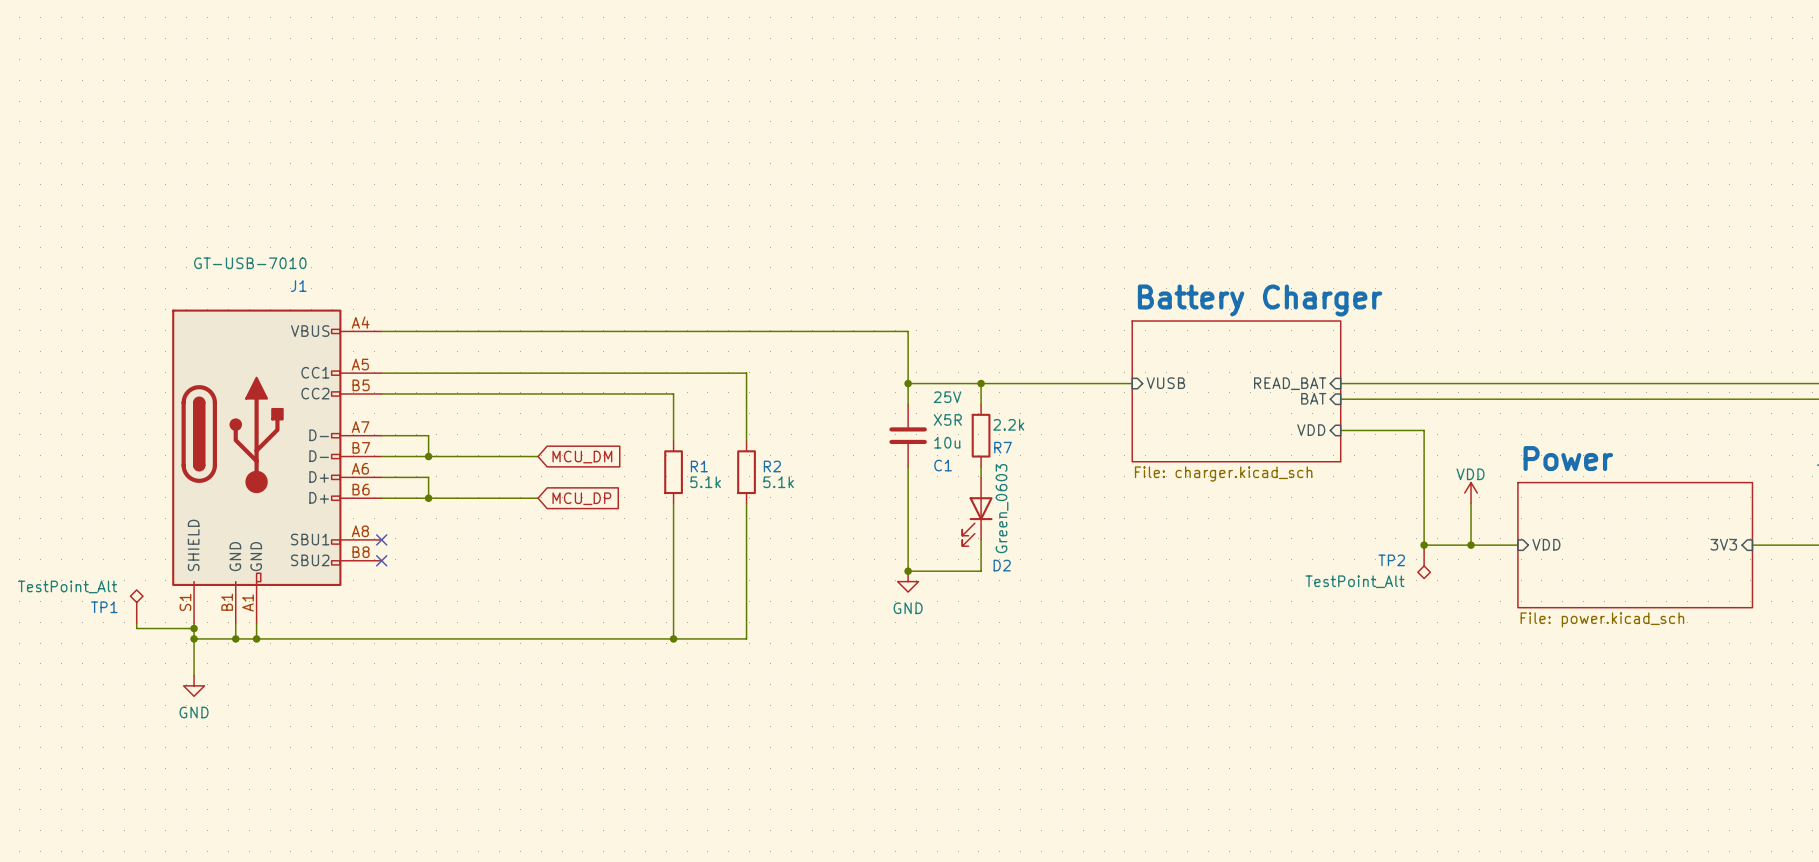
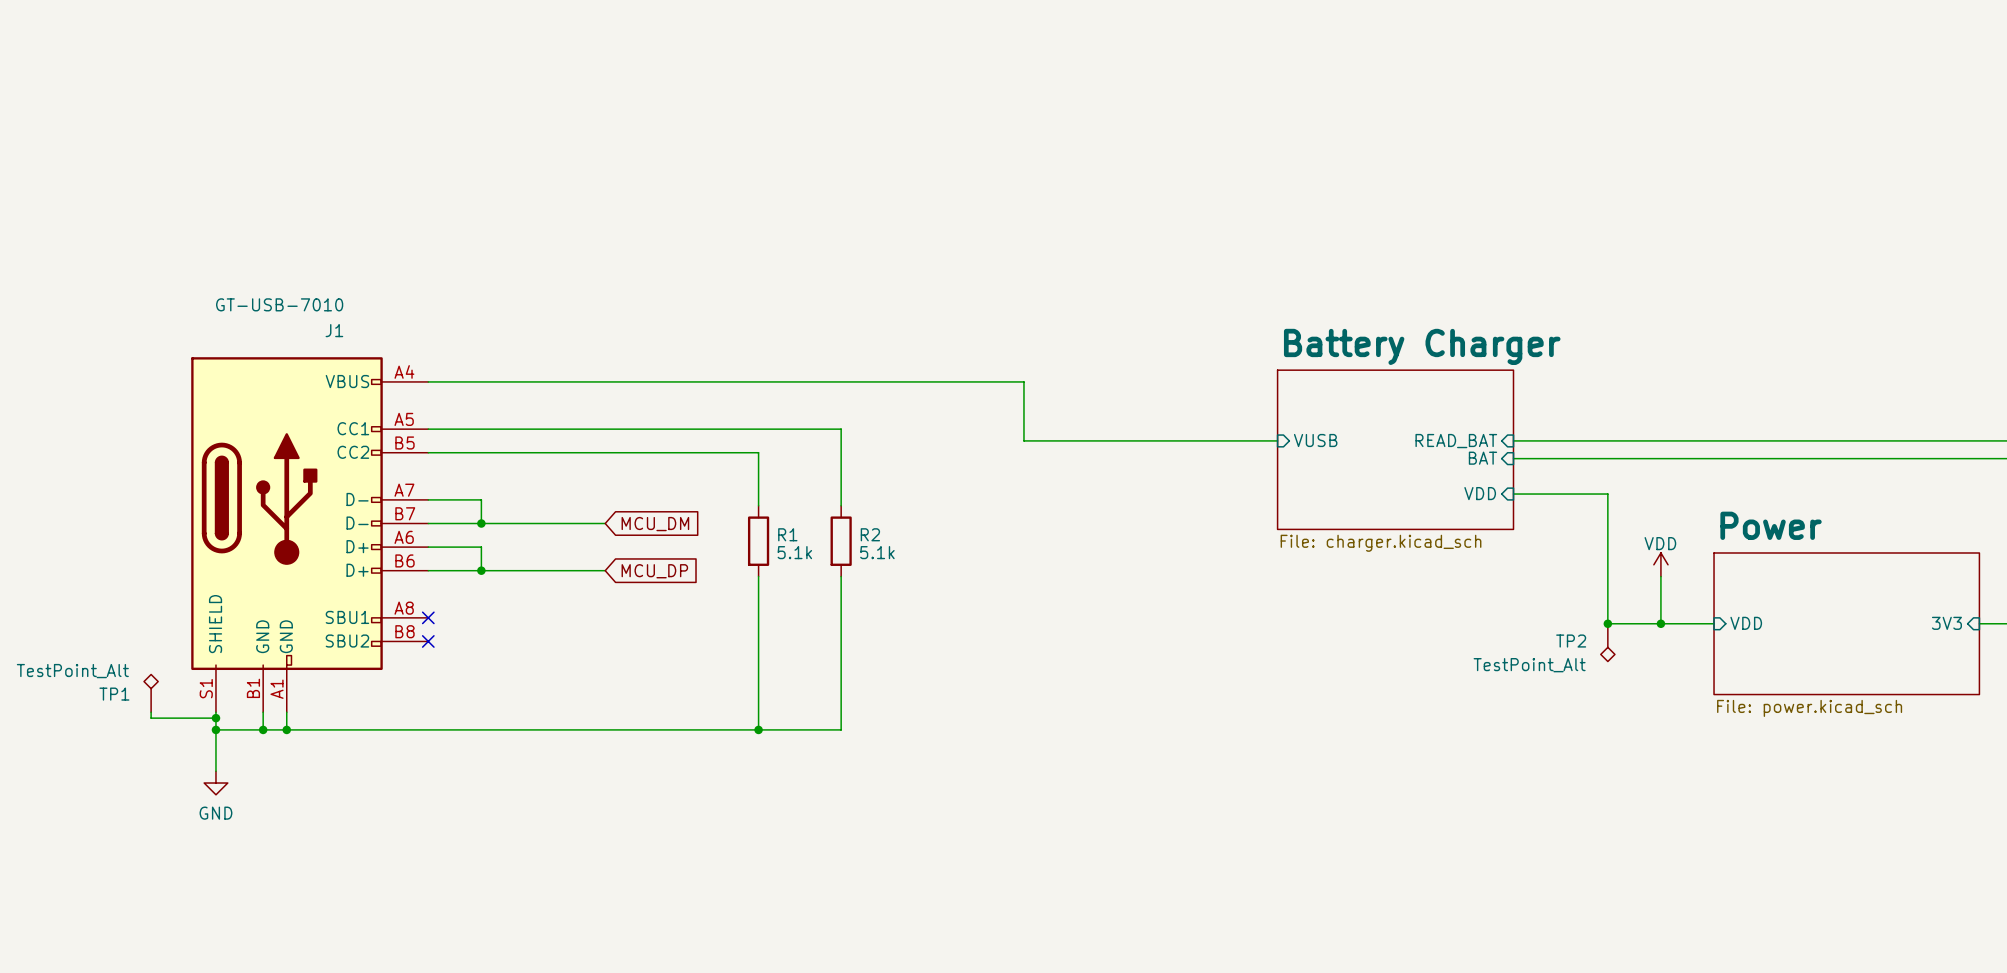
wire: (908, 383) (908, 404) -> none
junction: (908, 383) -> none
wire: (981, 383) (981, 404) -> none
junction: (981, 383) -> none
C1: 10u (908, 435) -> none
R7: 2.2k (981, 435) -> none
wire: (908, 466) (908, 571) (981, 571) (981, 539) -> none
wire: (981, 466) (981, 477) -> none
D2: Green_0603 (977, 511) -> none
junction: (908, 571) -> none
power symbol: GND (908, 581) -> none

